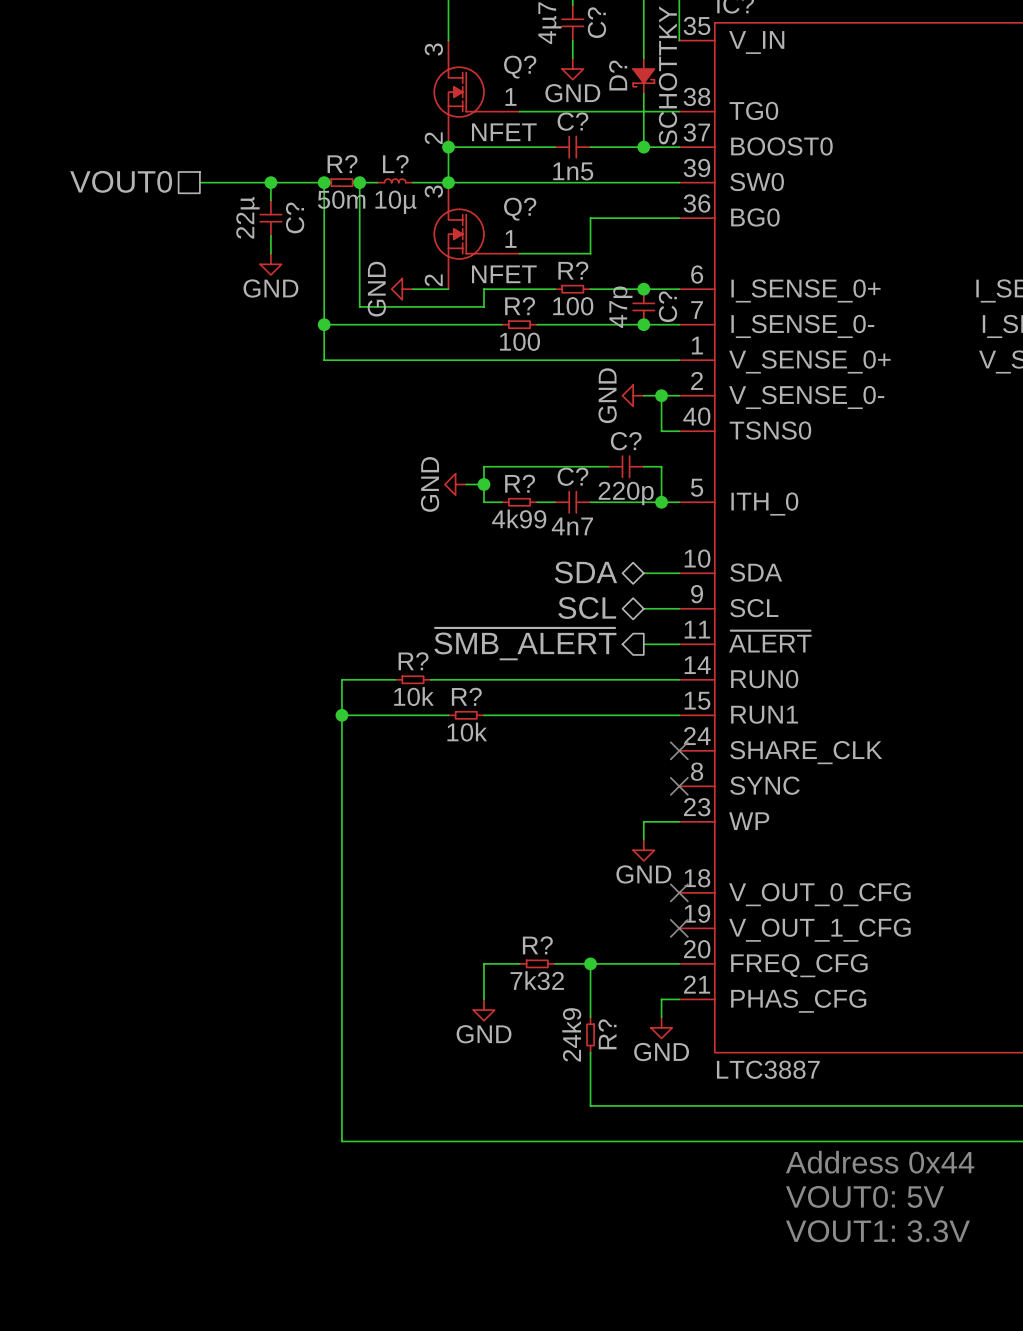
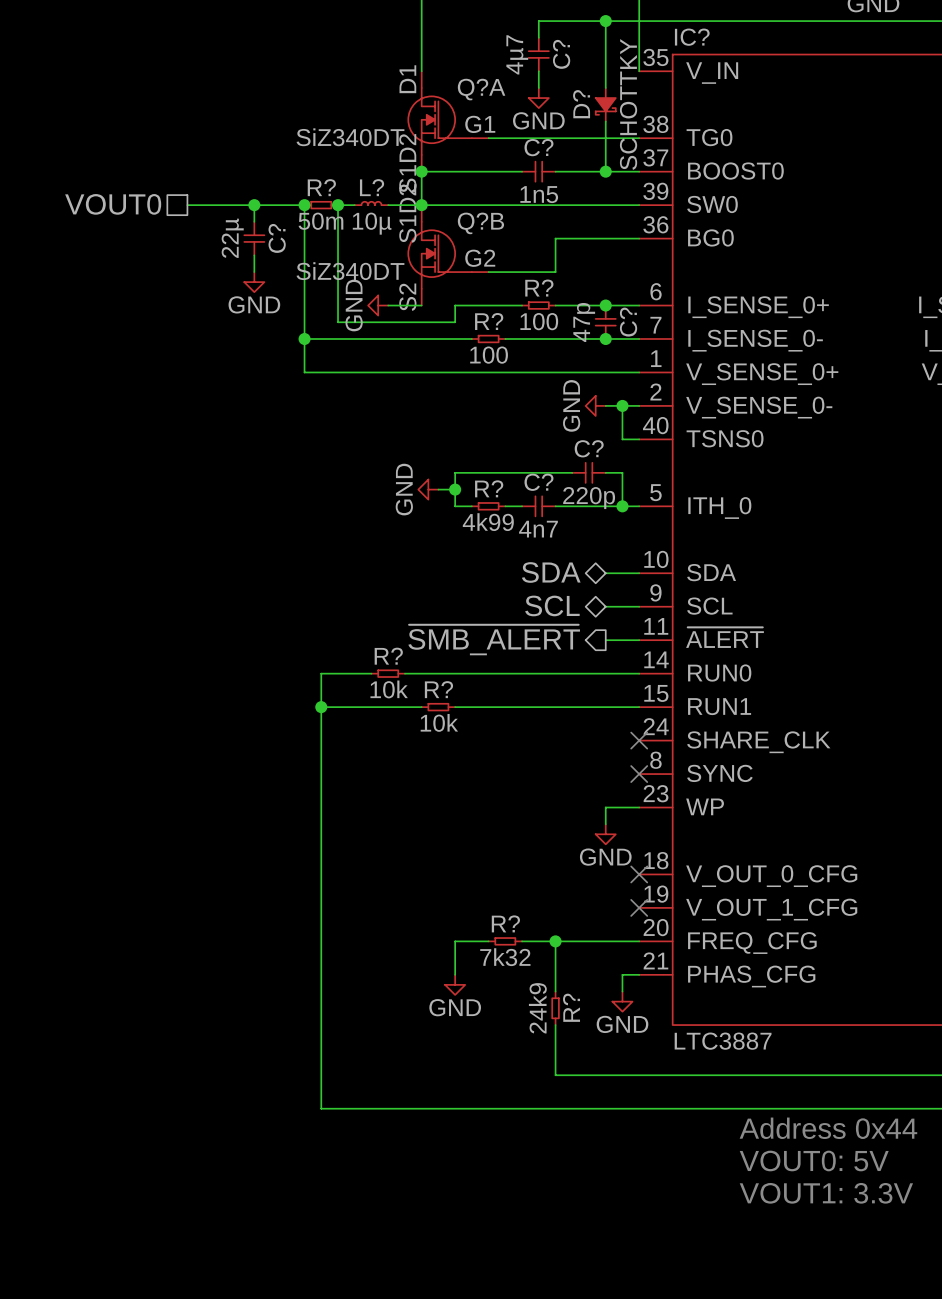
Q? pin number: 3 (433, 49) -> D1 (407, 79)
Q? name: Q? (520, 67) -> Q?A (481, 89)
Q? pin number: 1 (510, 96) -> G1 (480, 124)
Q? value: NFET (504, 132) -> SiZ340DT (350, 137)
Q? pin number: 2 (433, 138) -> S1D2 (407, 163)
Q? pin number: 3 (433, 191) -> S1D2 (407, 213)
Q? name: Q? (520, 209) -> Q?B (480, 223)
Q? pin number: 1 (510, 239) -> G2 (480, 258)
Q? value: NFET (504, 274) -> SiZ340DT (350, 271)
Q? pin number: 2 (433, 280) -> S2 (407, 297)

